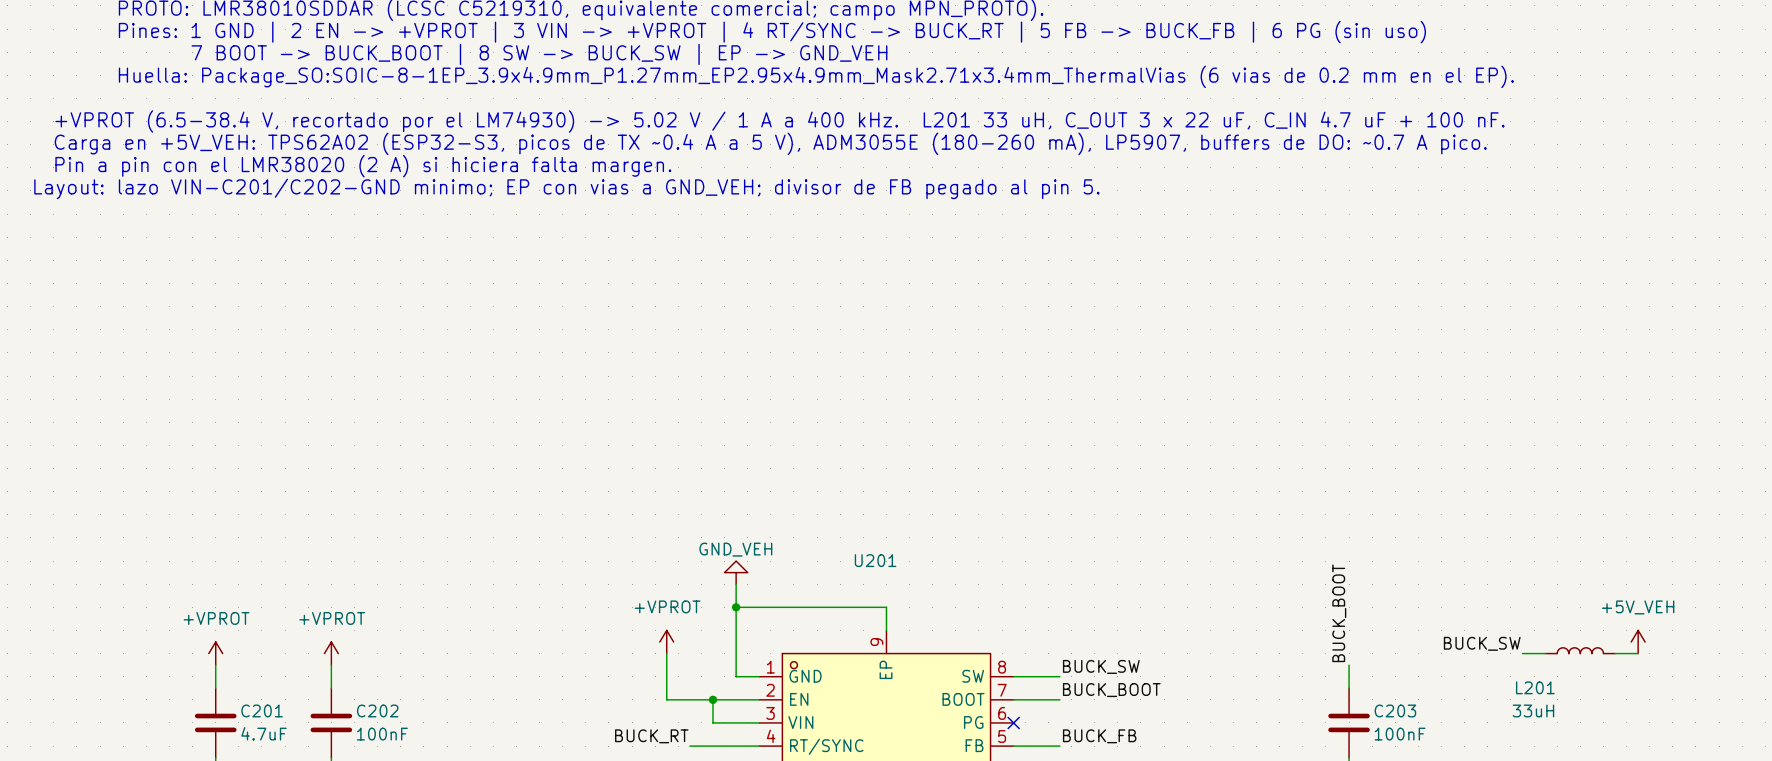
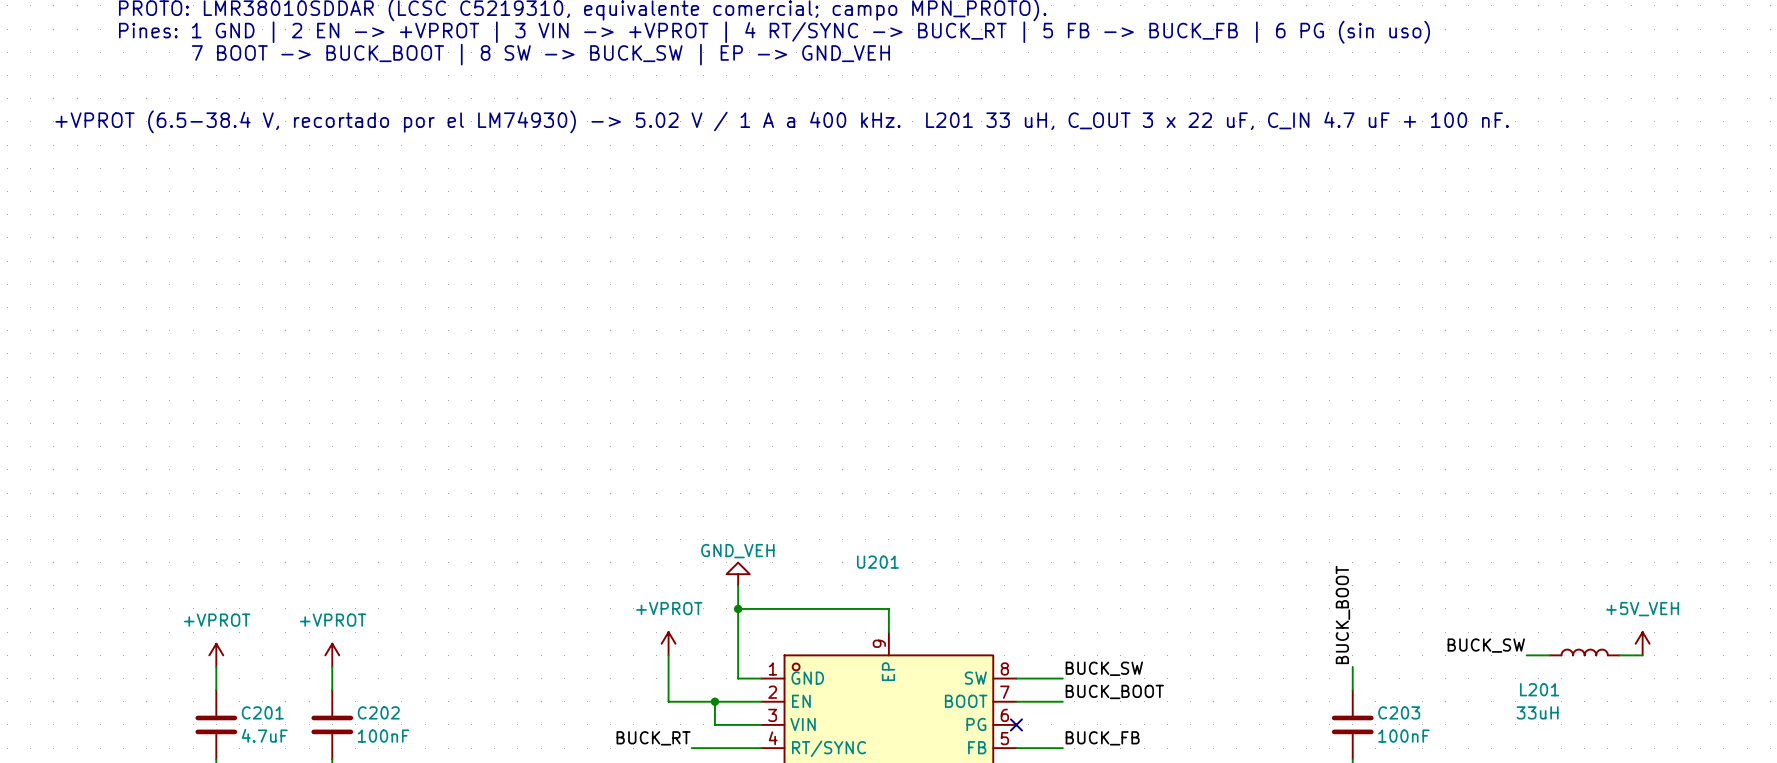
text: Huella: Package_SO:SOIC-8-1EP_3.9x4.9mm_P1.27mm_EP2.95x4.9mm_Mask2.71x3.4mm_ThermalVias (6 vias de 0.2 mm en el EP). (816, 76) -> none
text: Carga en +5V_VEH: TPS62A02 (ESP32-S3, picos de TX ~0.4 A a 5 V), ADM3055E (180-260 mA), LP5907, buffers de DO: ~0.7 A pico. (770, 143) -> none
text: Pin a pin con el LMR38020 (2 A) si hiciera falta margen. (363, 166) -> none
text: Layout: lazo VIN-C201/C202-GND minimo; EP con vias a GND_VEH; divisor de FB pegado al pin 5. (566, 188) -> none

